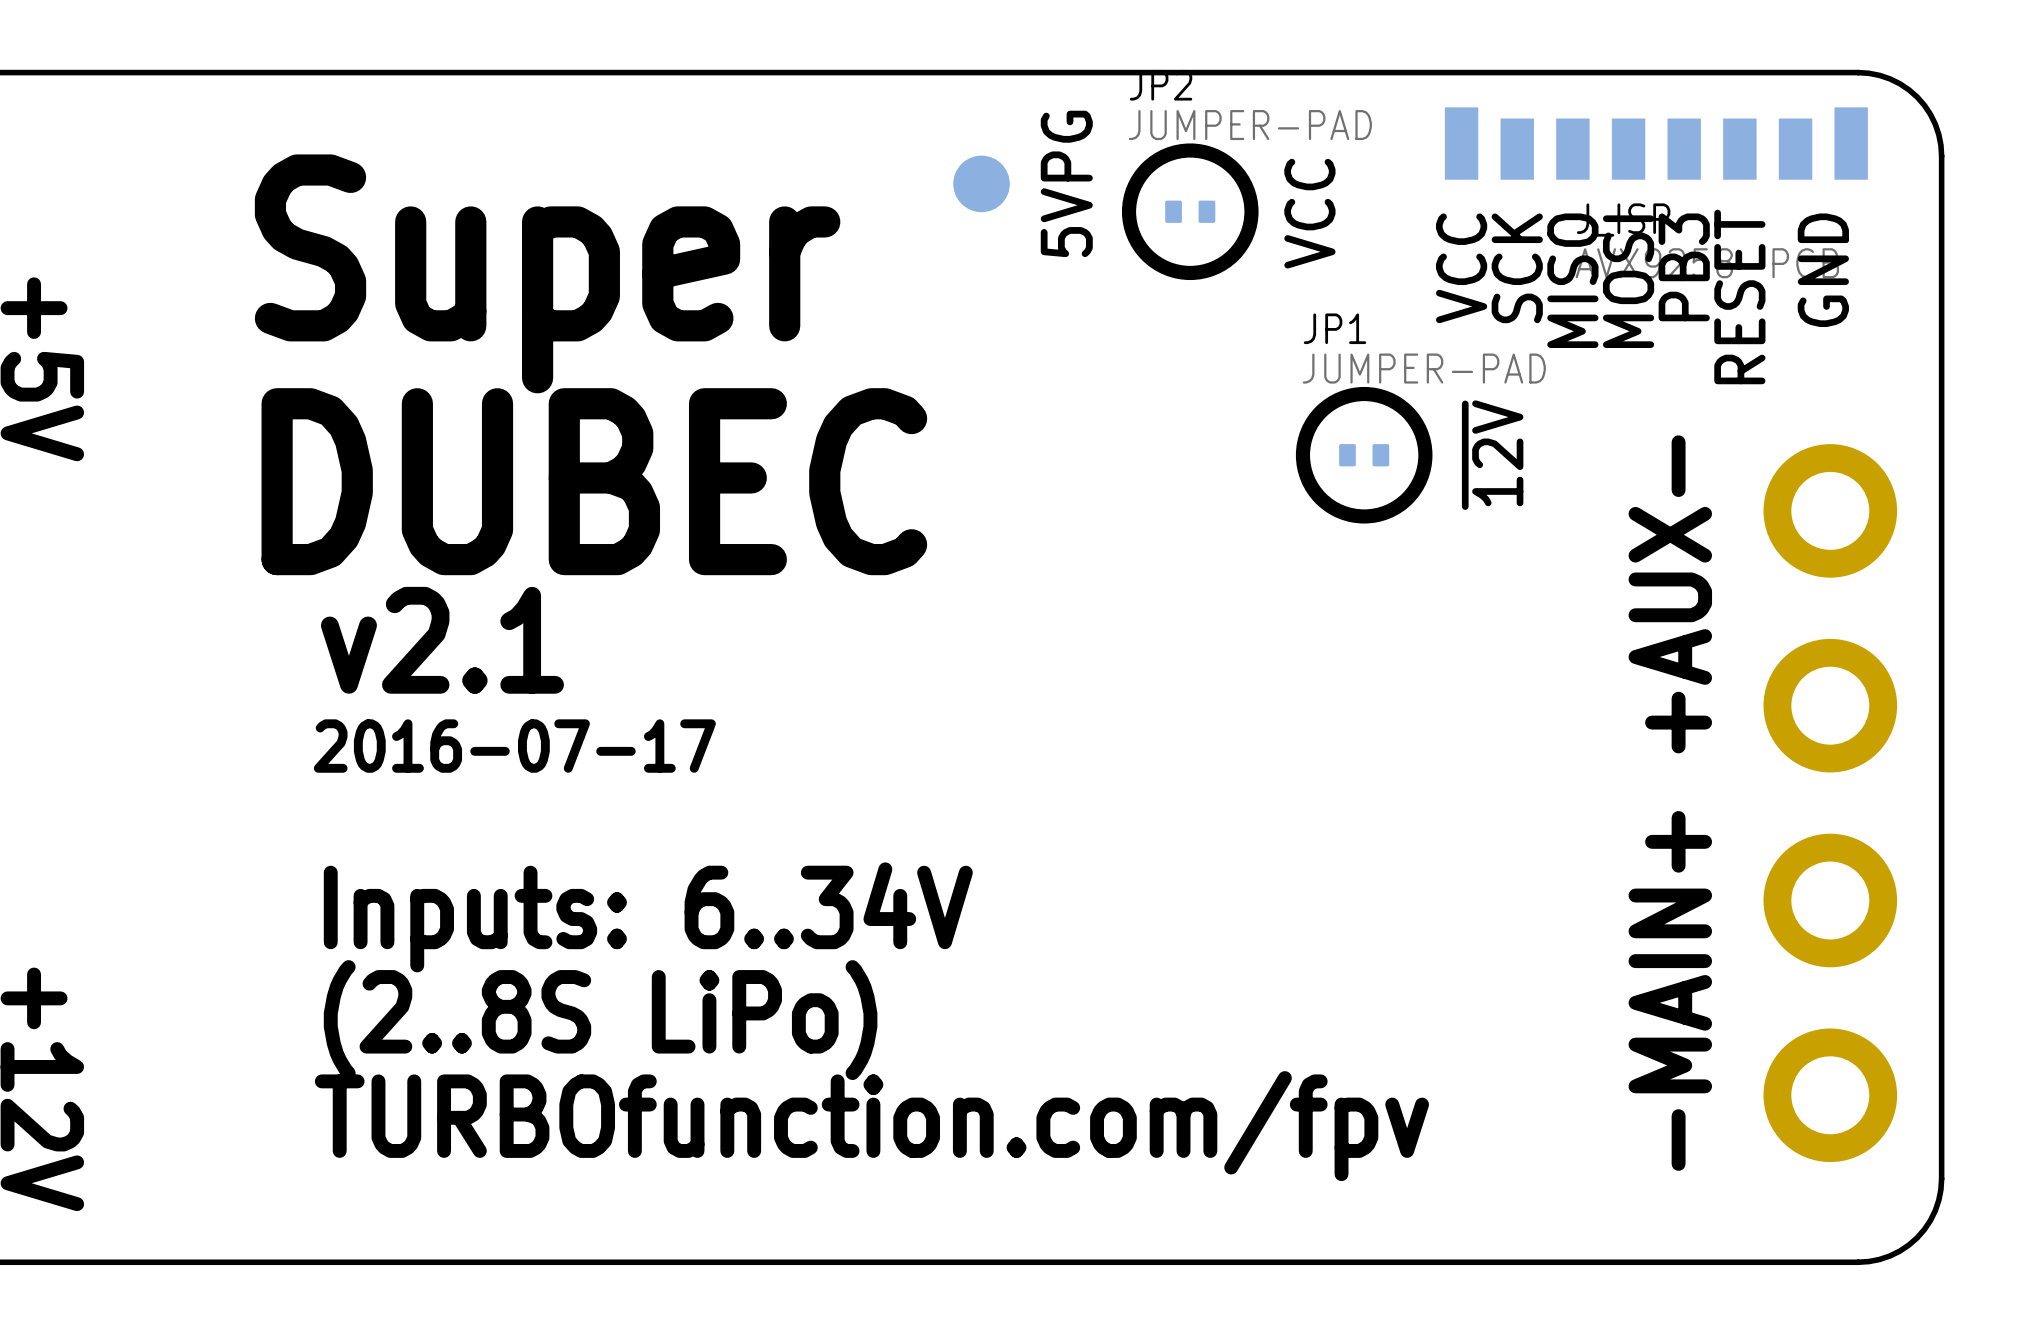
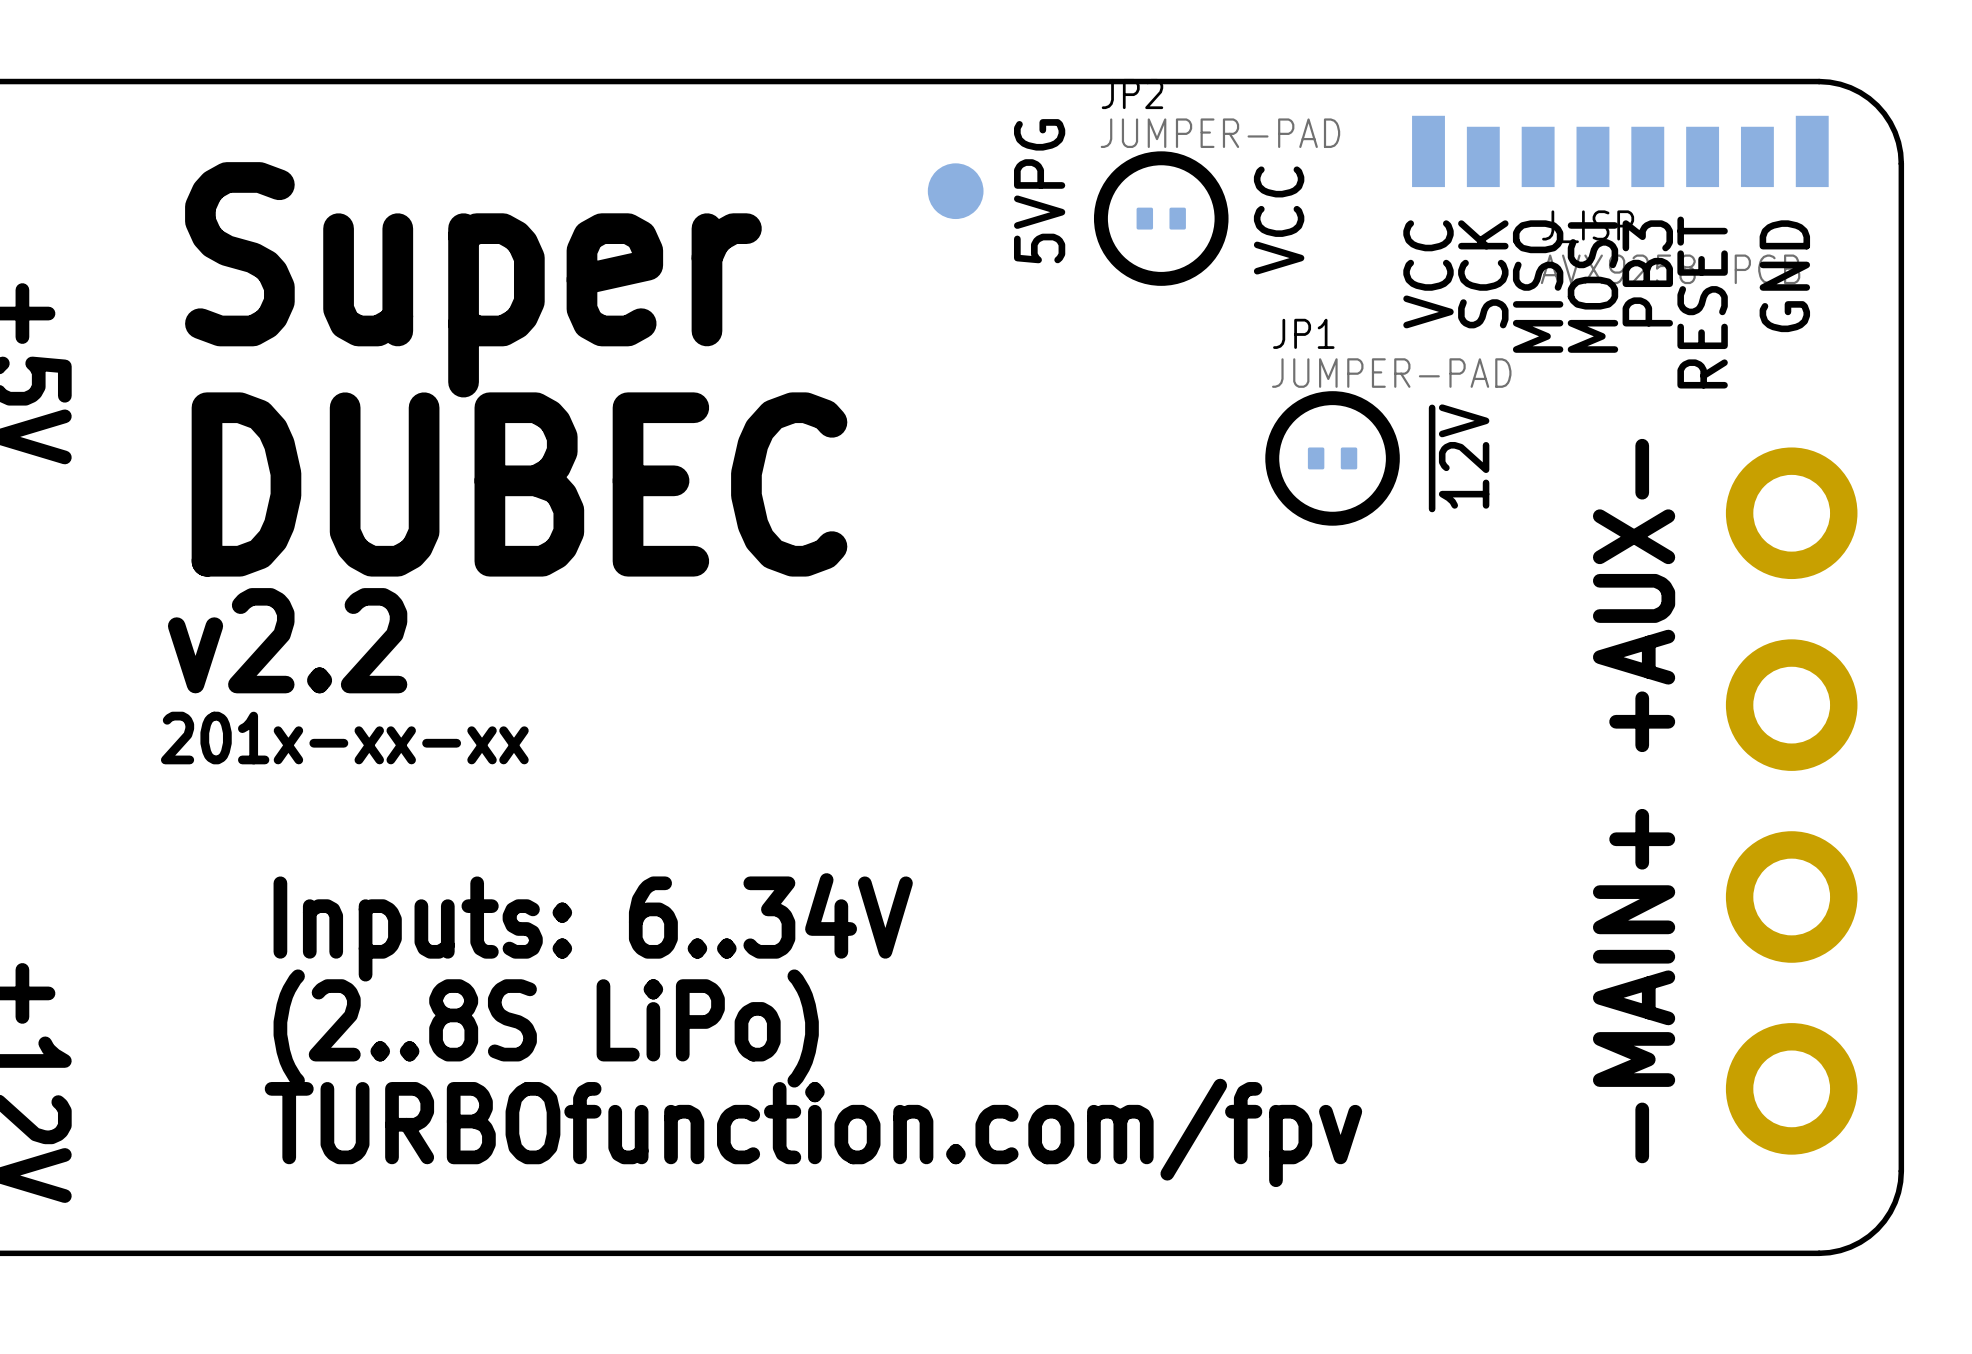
text position: Super (547, 273) -> Super (473, 279)
text position: DUBEC (594, 481) -> DUBEC (519, 484)
text: v2.1 (442, 640) -> v2.2 (287, 640)
text: none -> 201x-xx-xx (344, 738)
text: 2016-07-17 (514, 746) -> none
text position: Inputs: 6..34V (648, 917) -> Inputs: 6..34V (593, 927)
text position: (2..8S LiPo) (600, 1020) -> (2..8S LiPo) (546, 1028)
text position: TURBOfunction.com/fpv (871, 1126) -> TURBOfunction.com/fpv (813, 1132)

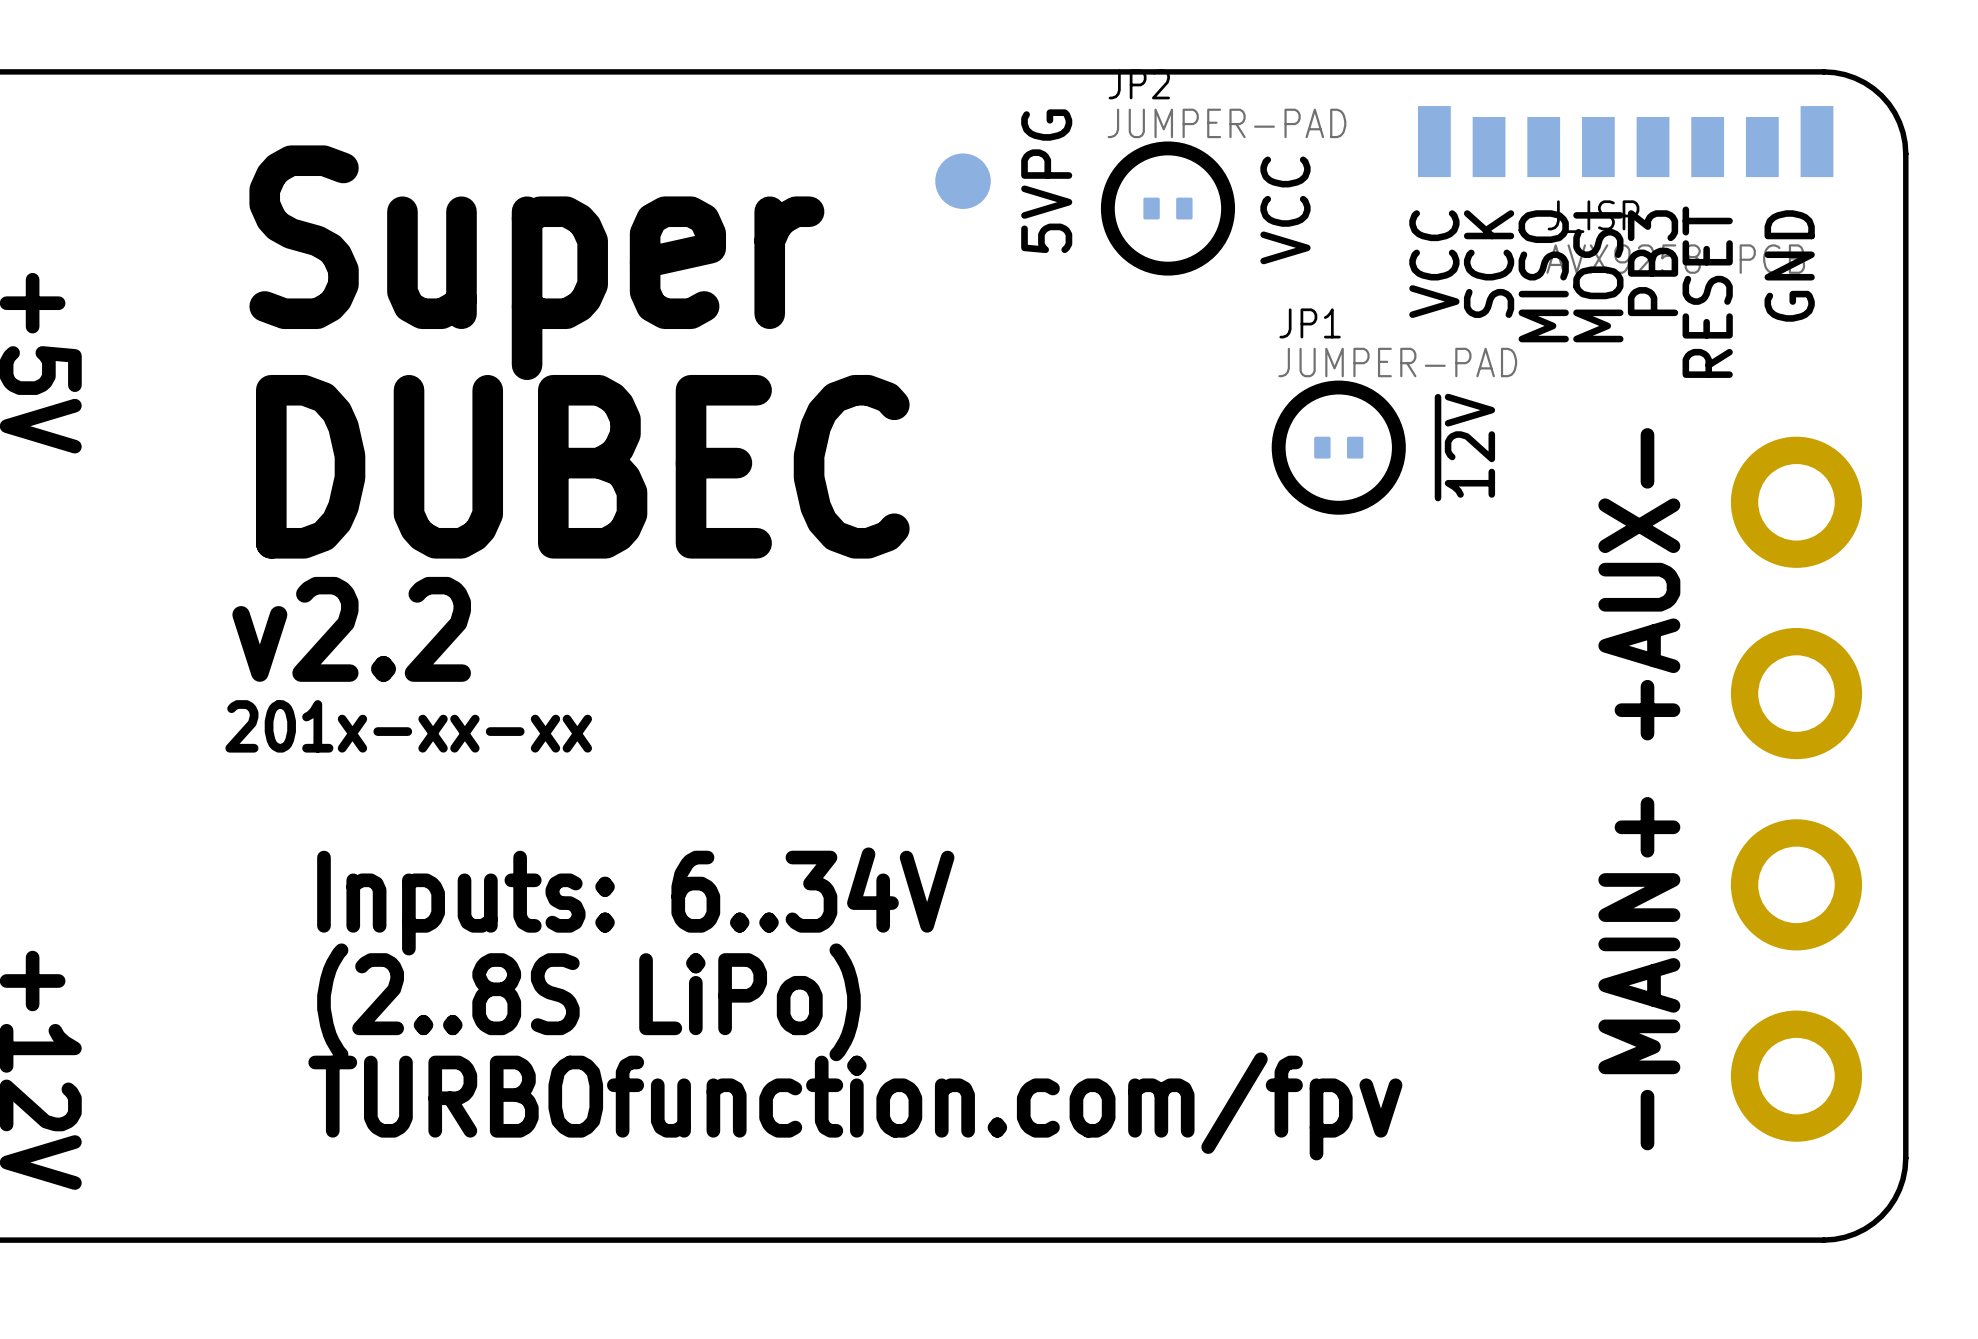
text position: Super (473, 279) -> Super (536, 262)
text position: DUBEC (519, 484) -> DUBEC (582, 466)
text position: v2.2 (287, 640) -> v2.2 (351, 629)
text position: 201x-xx-xx (344, 738) -> 201x-xx-xx (408, 726)
text position: Inputs: 6..34V (593, 927) -> Inputs: 6..34V (635, 901)
text position: (2..8S LiPo) (546, 1028) -> (2..8S LiPo) (588, 1002)
text position: TURBOfunction.com/fpv (813, 1132) -> TURBOfunction.com/fpv (855, 1106)

